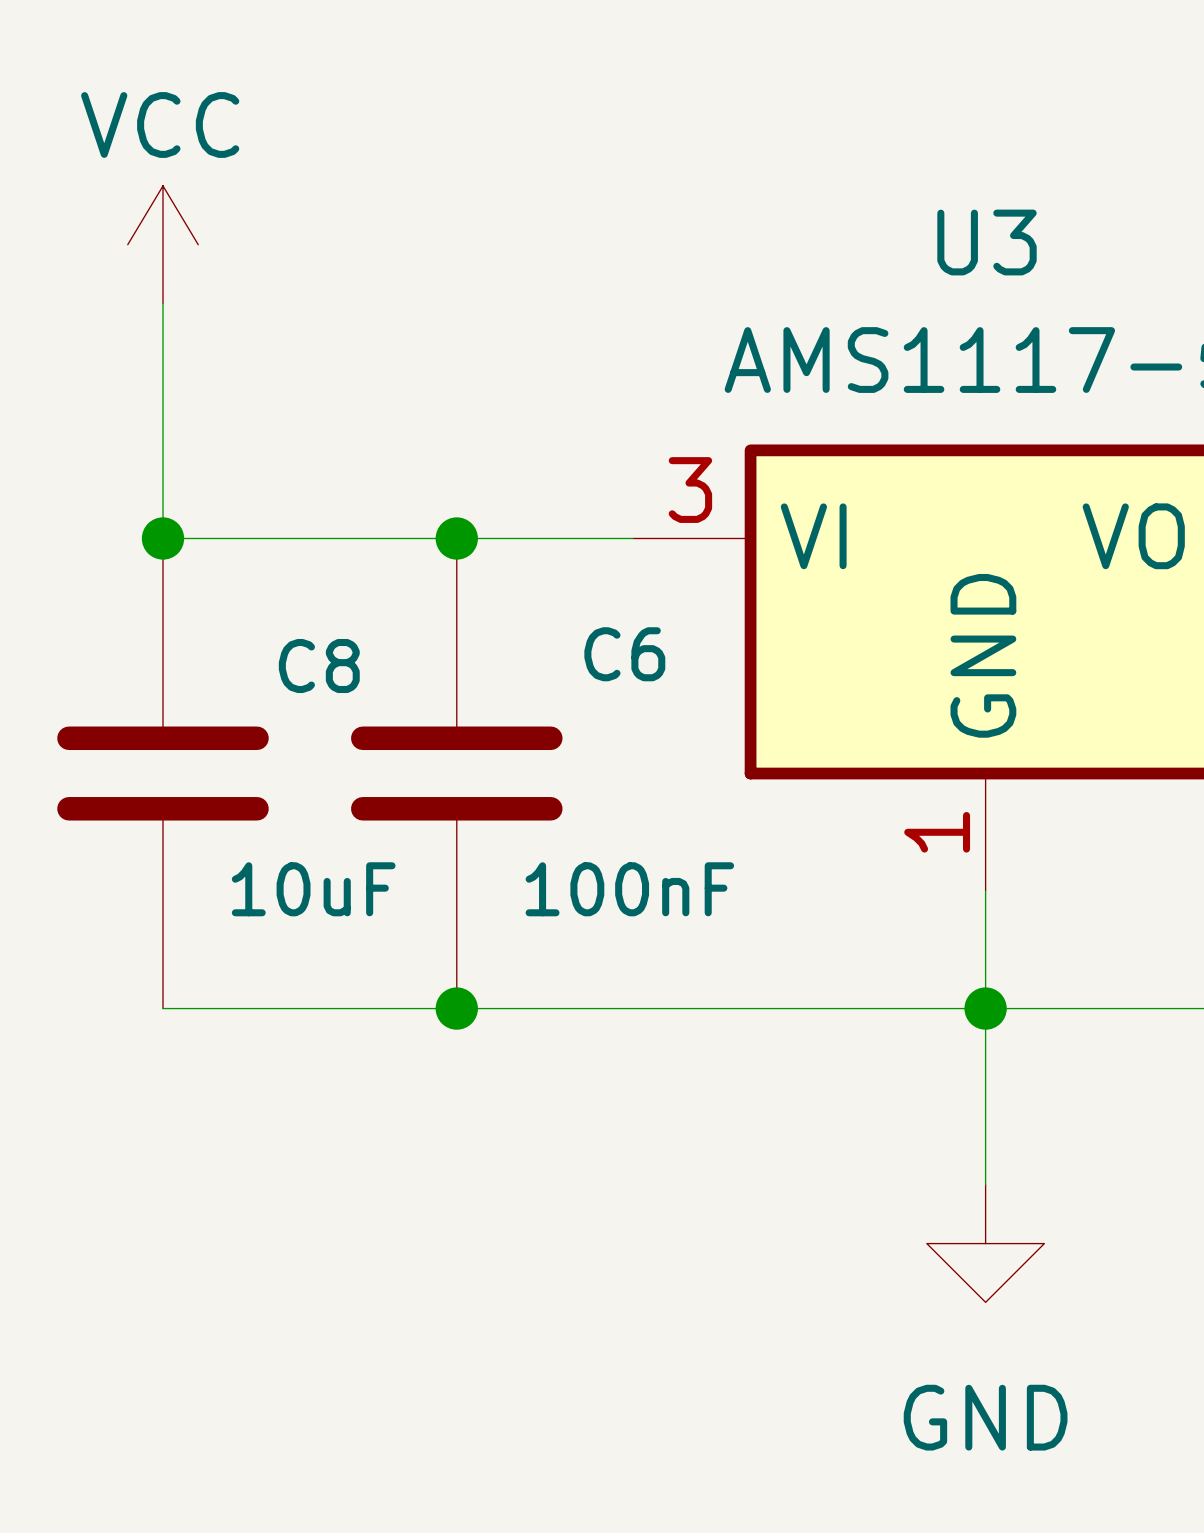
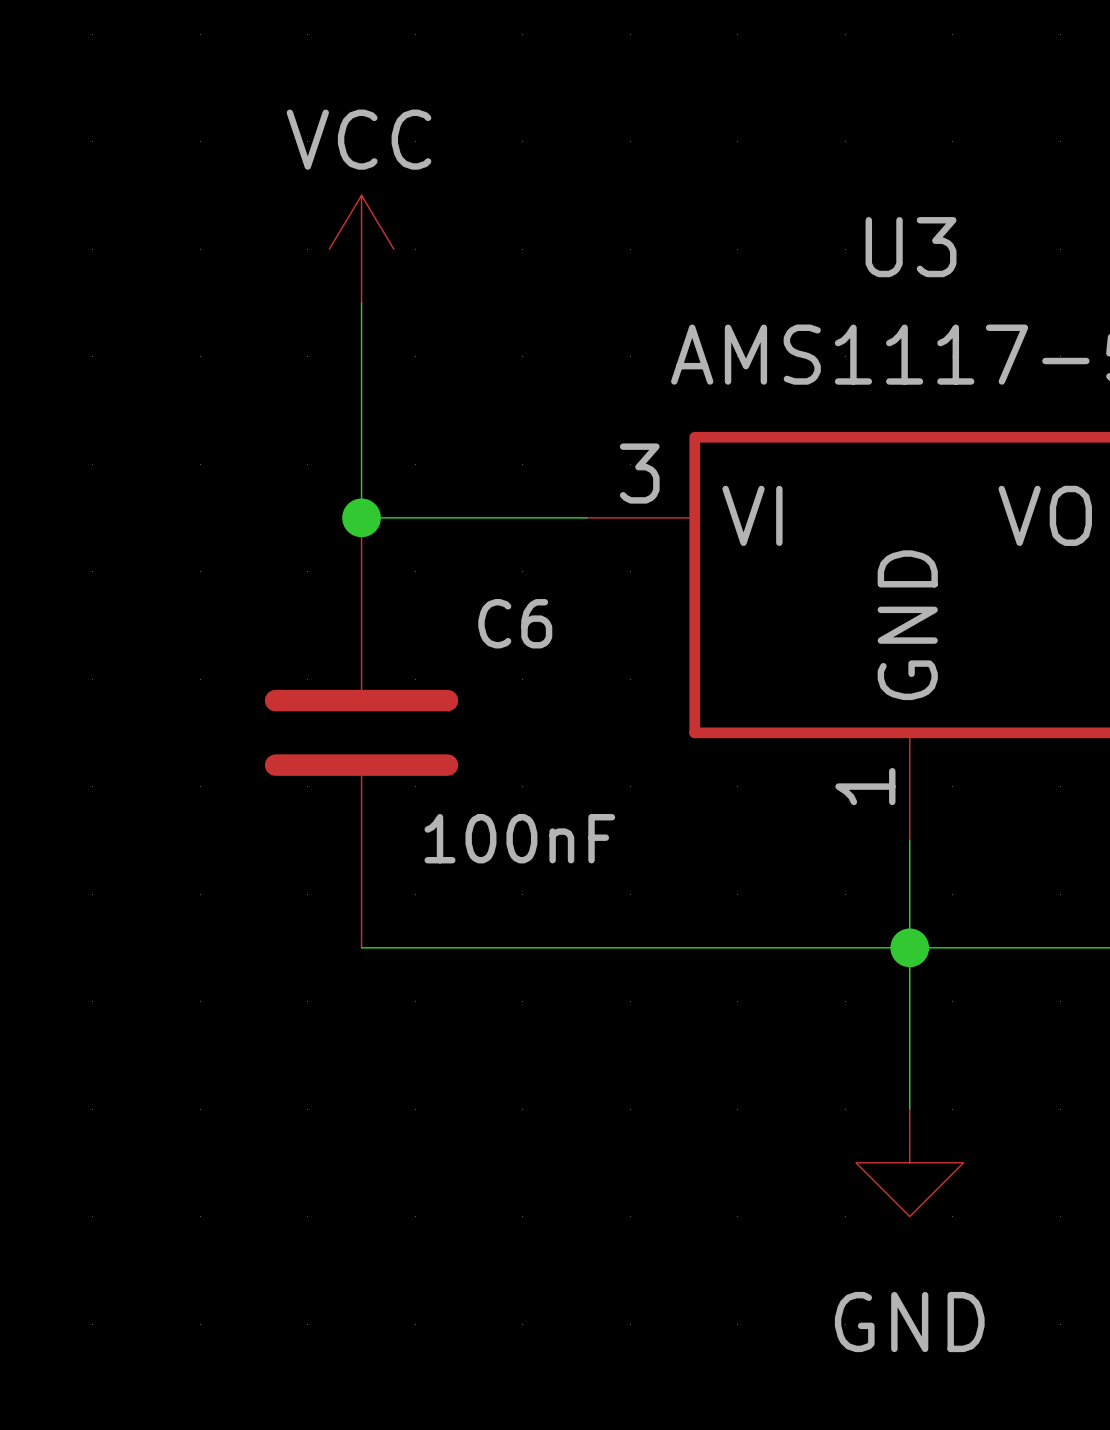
power symbol position: VCC (162, 244) -> VCC (361, 249)
wire: (162, 303) (162, 538) (386, 538) -> (361, 302) (361, 517)
junction: (162, 538) -> none
junction position: (456, 538) -> (361, 517)
C8: 10uF (162, 773) -> none
C6 position: (456, 773) -> (361, 732)
wire: (162, 1008) (386, 1008) -> none
junction: (456, 1008) -> none

